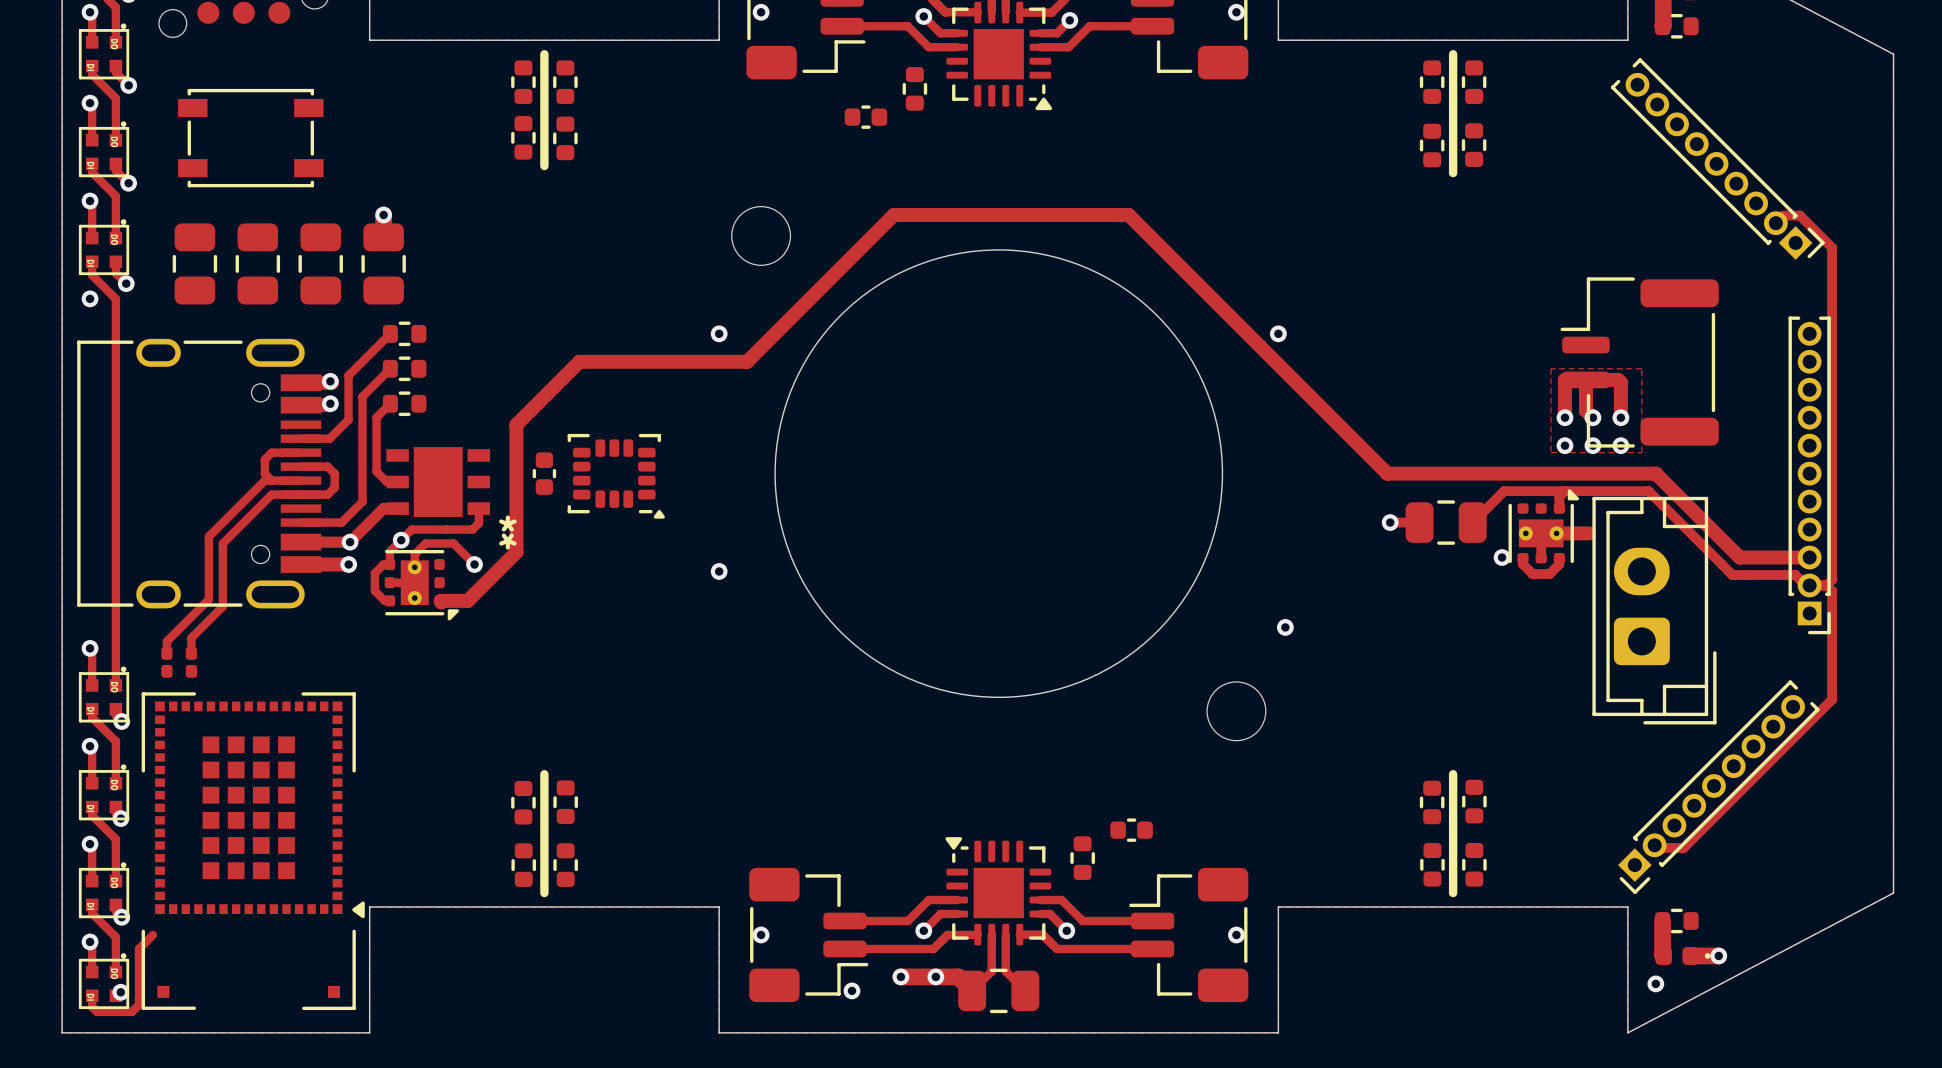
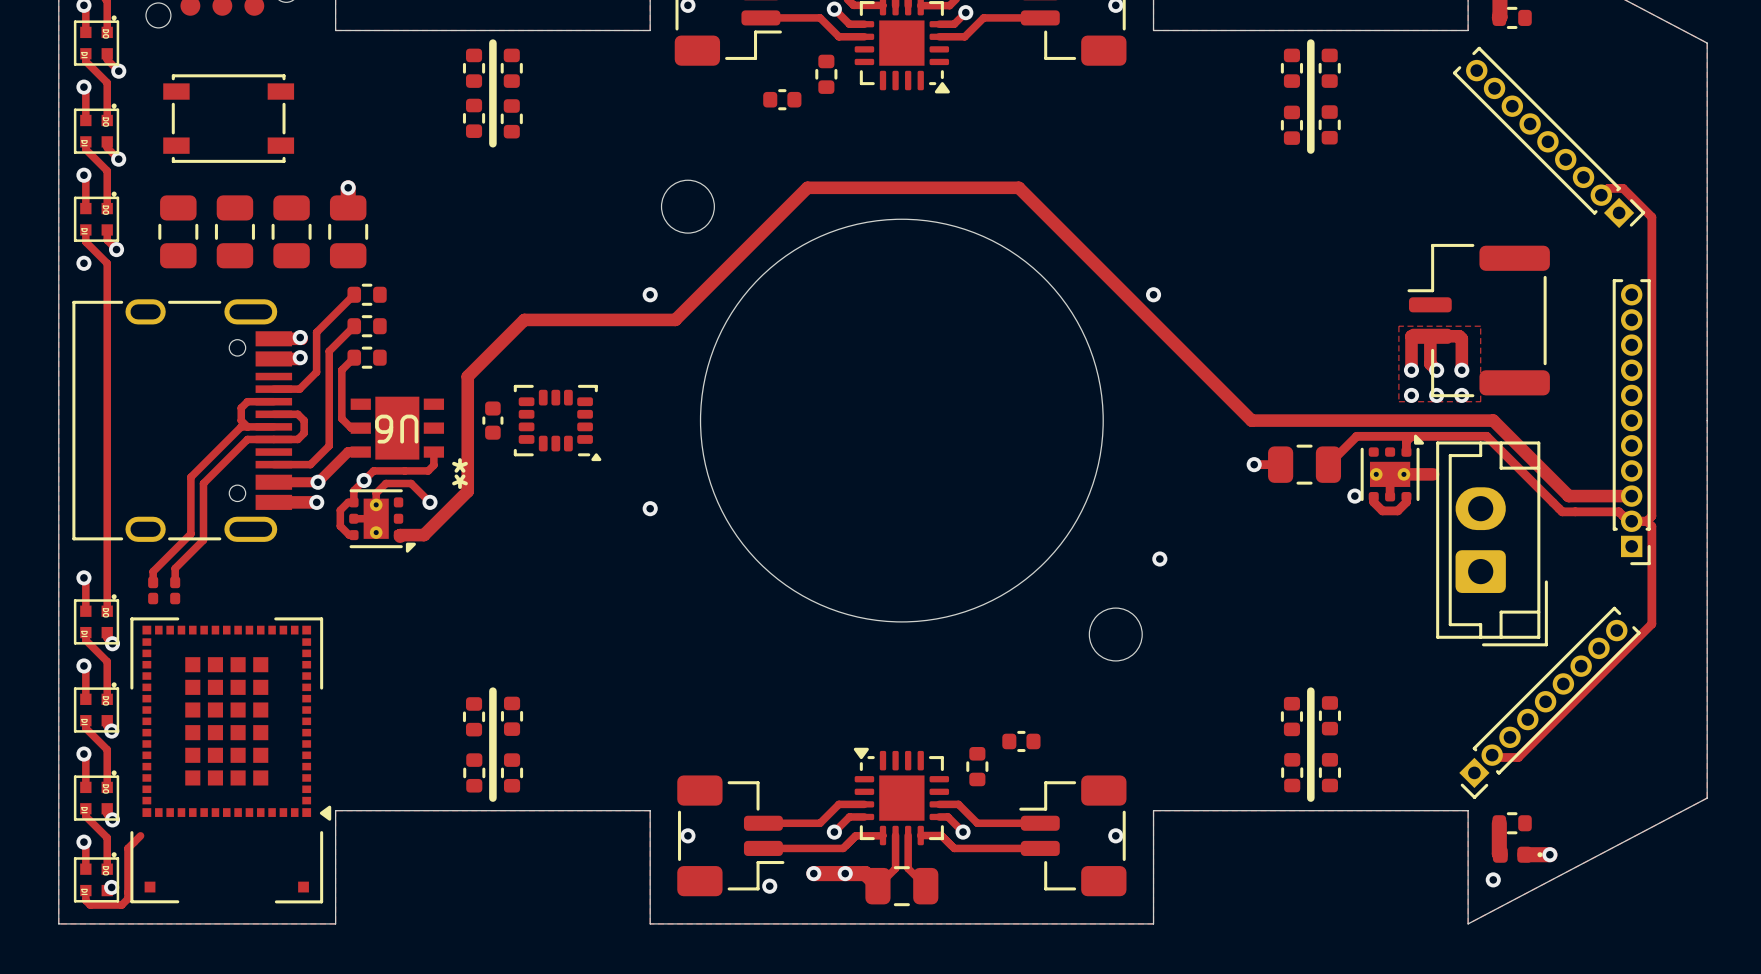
U6 name: none -> U6 (396, 429)

